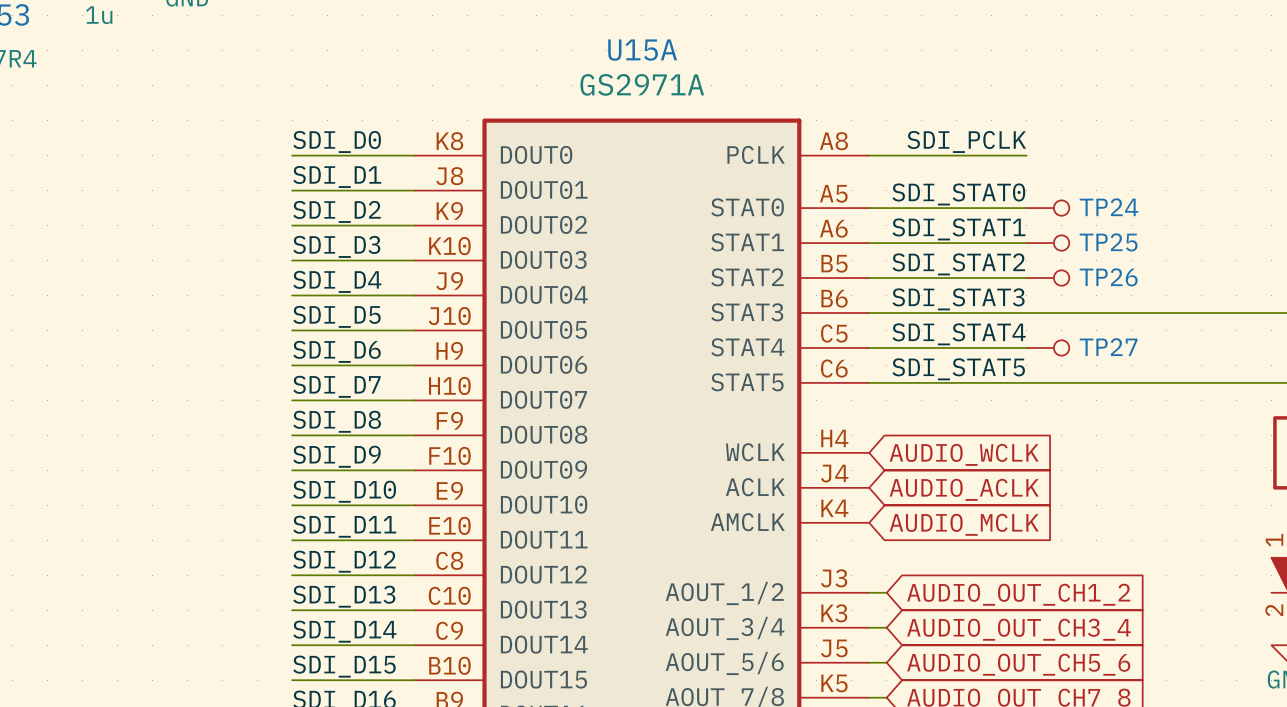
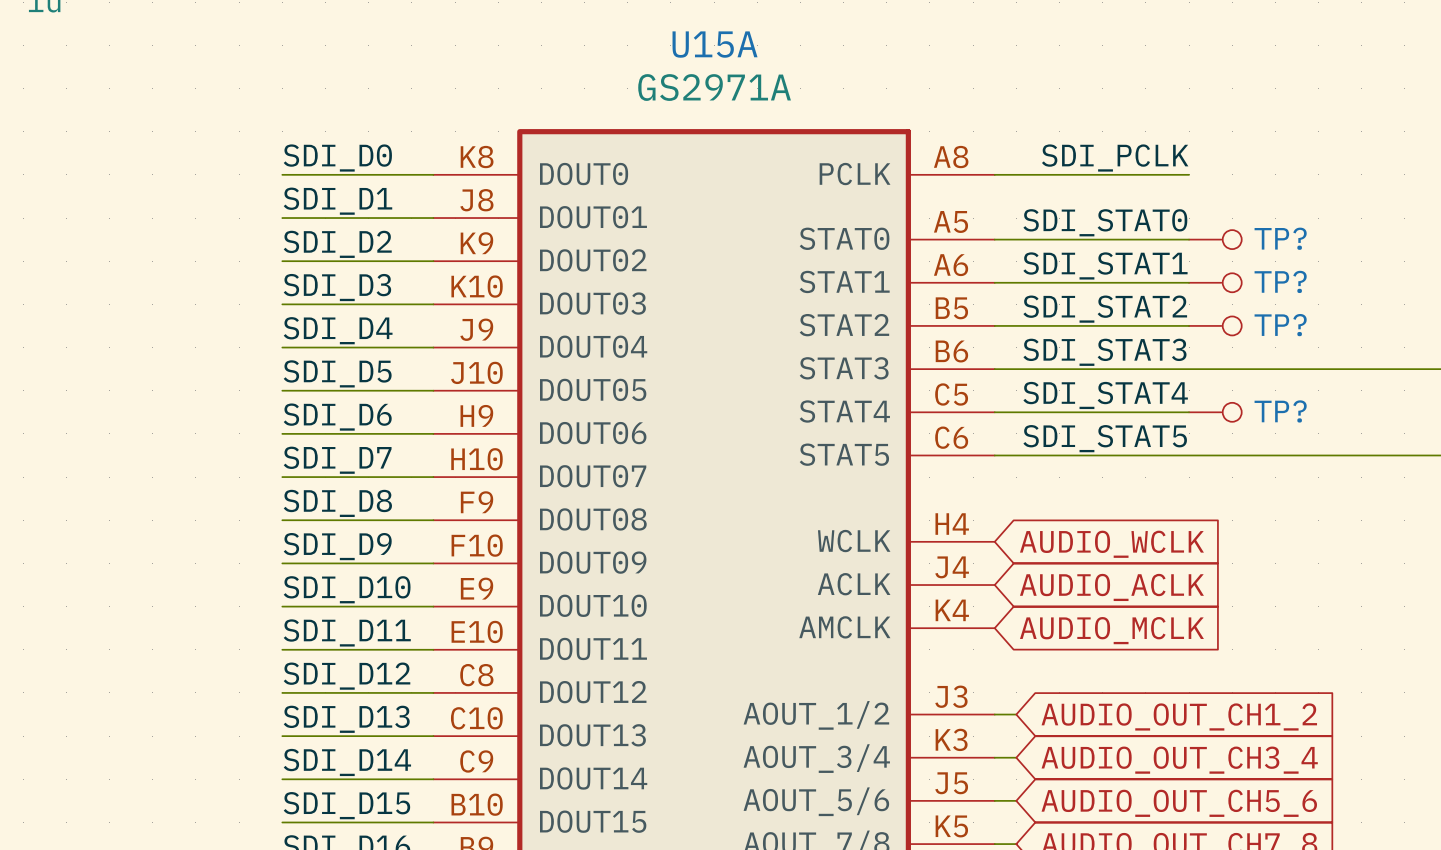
TP24 name: TP24 (1108, 207) -> TP? (1280, 238)
TP25 name: TP25 (1108, 242) -> TP? (1280, 281)
TP26 name: TP26 (1108, 277) -> TP? (1280, 325)
TP27 name: TP27 (1108, 347) -> TP? (1280, 411)

